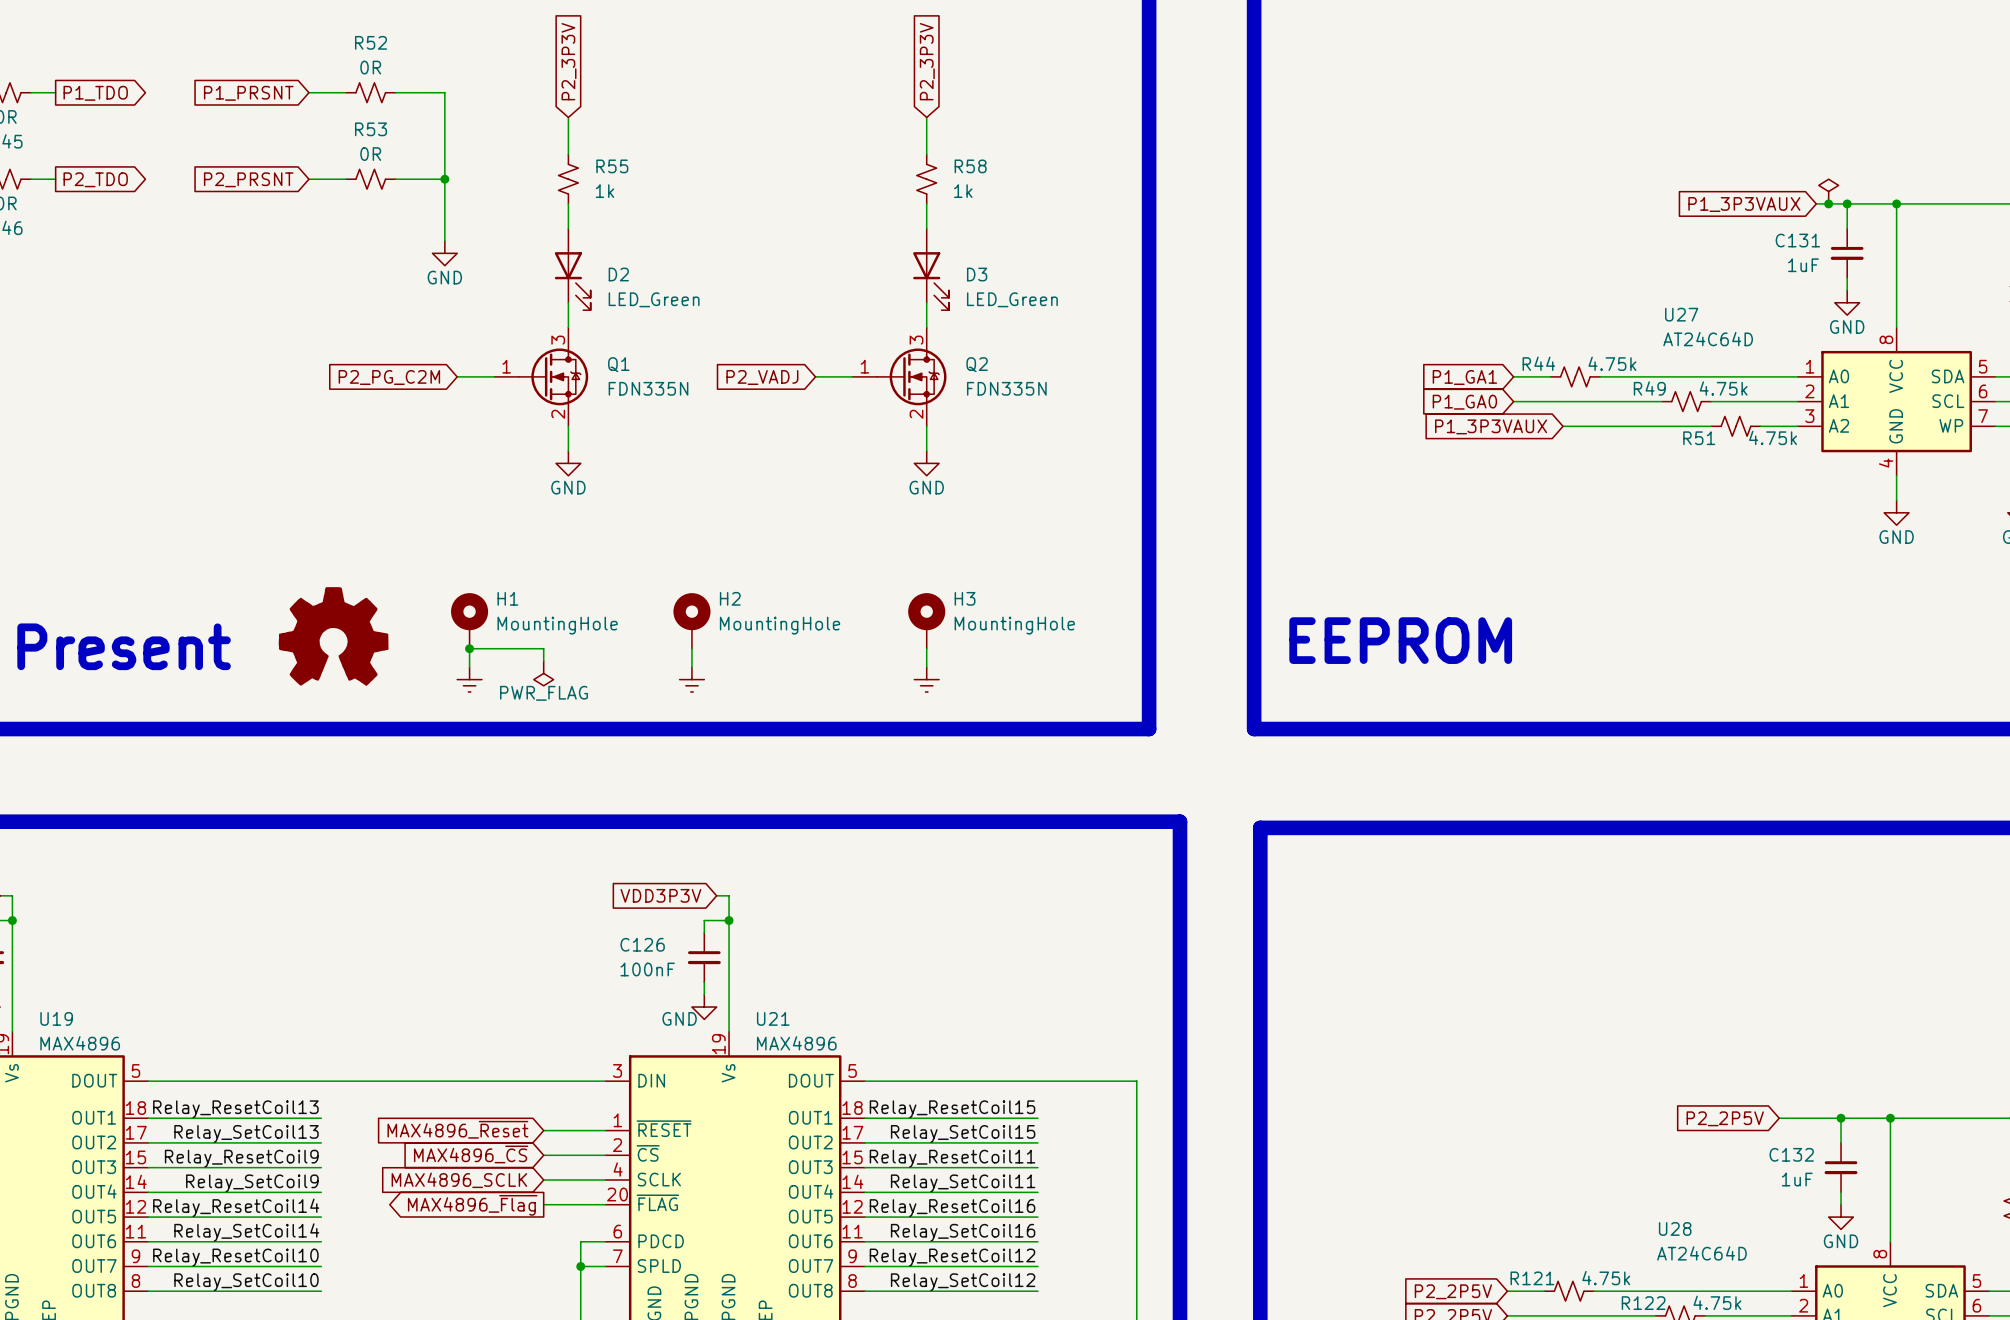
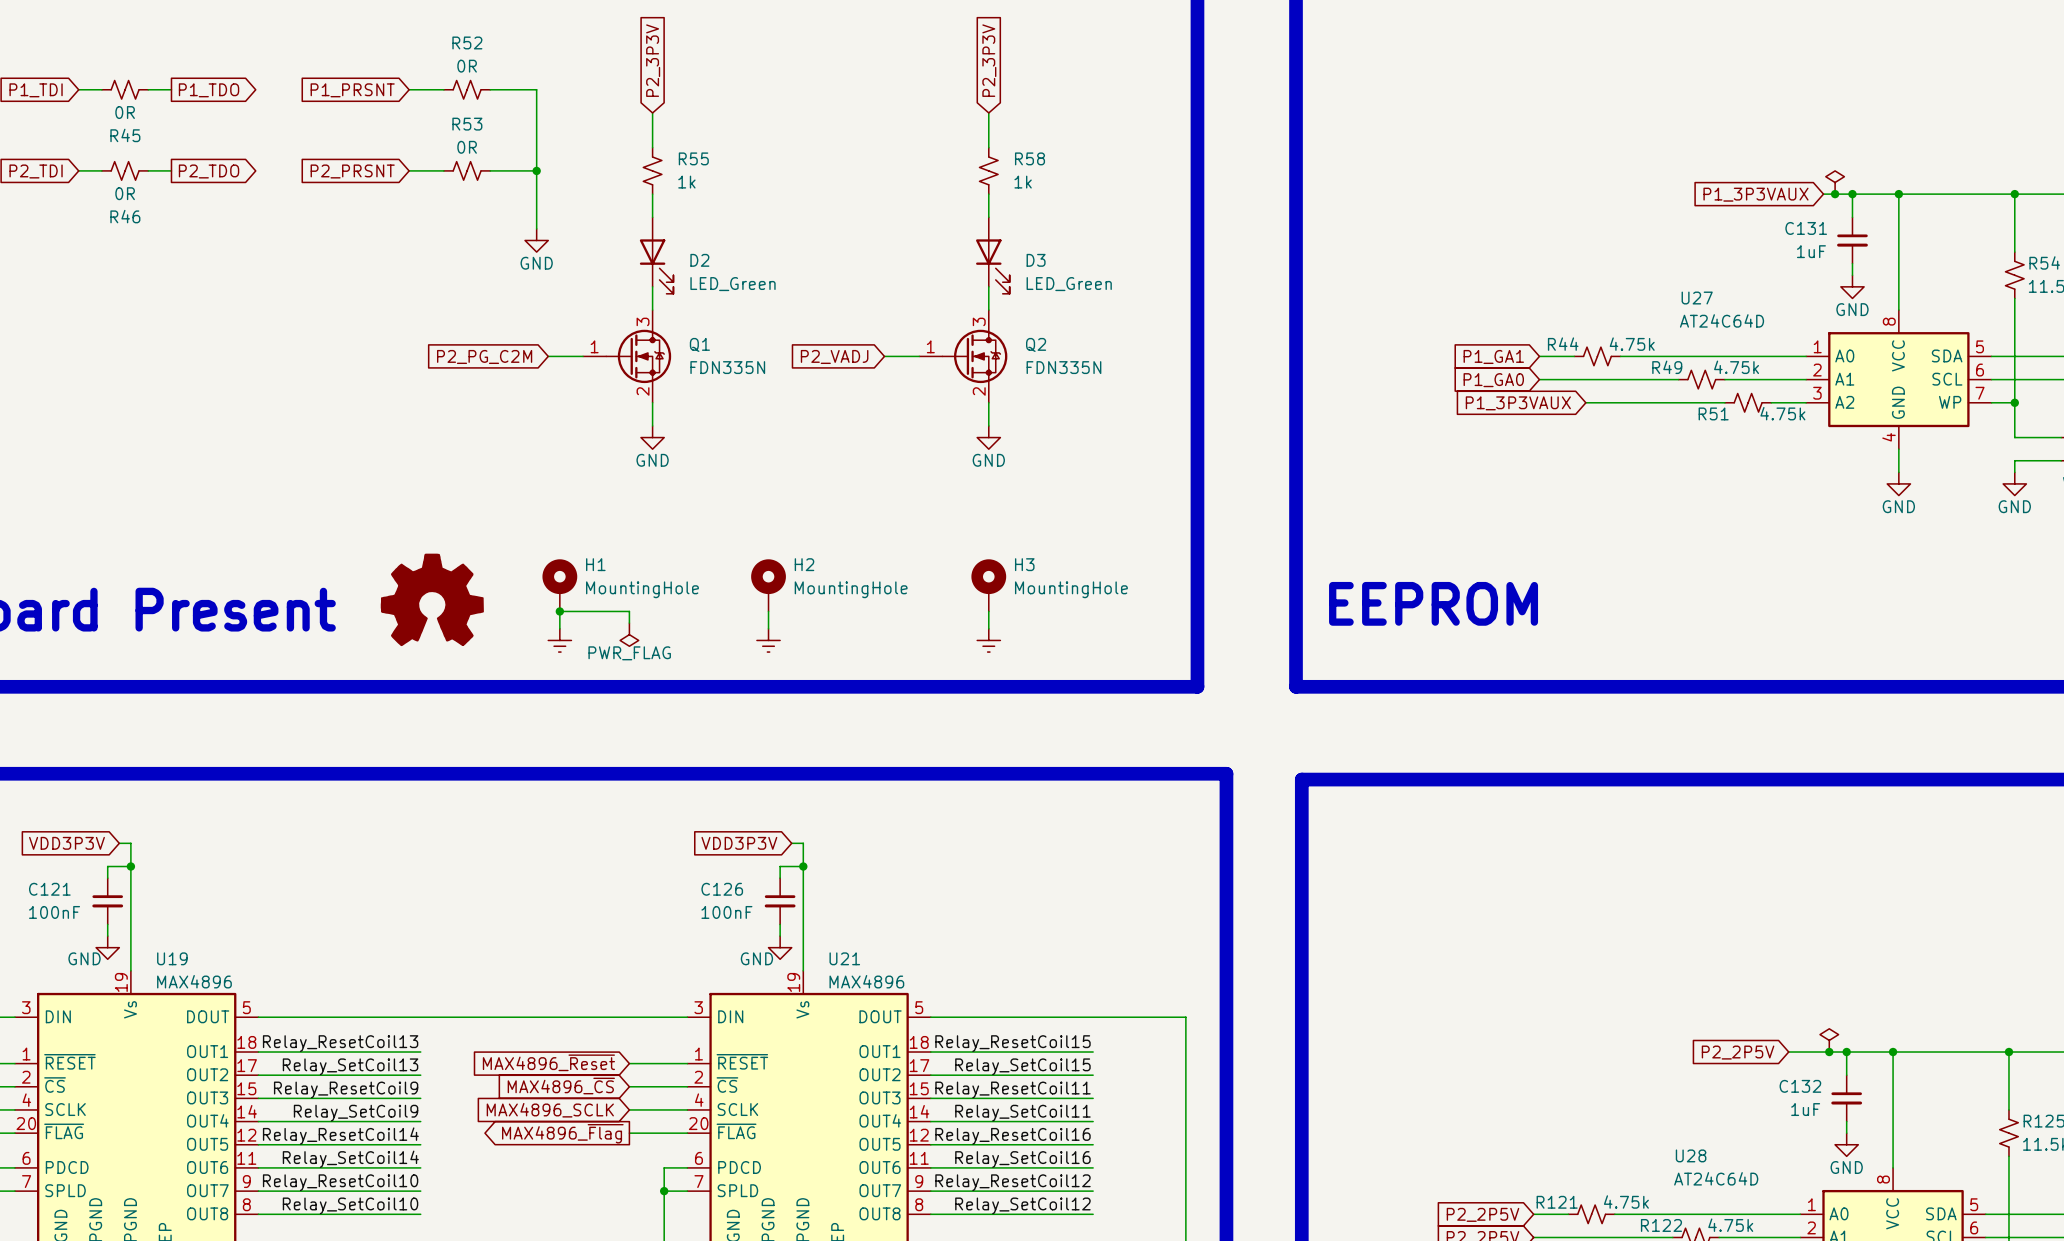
power symbol: none -> (1829, 1040)
junction: none -> (1829, 1052)

